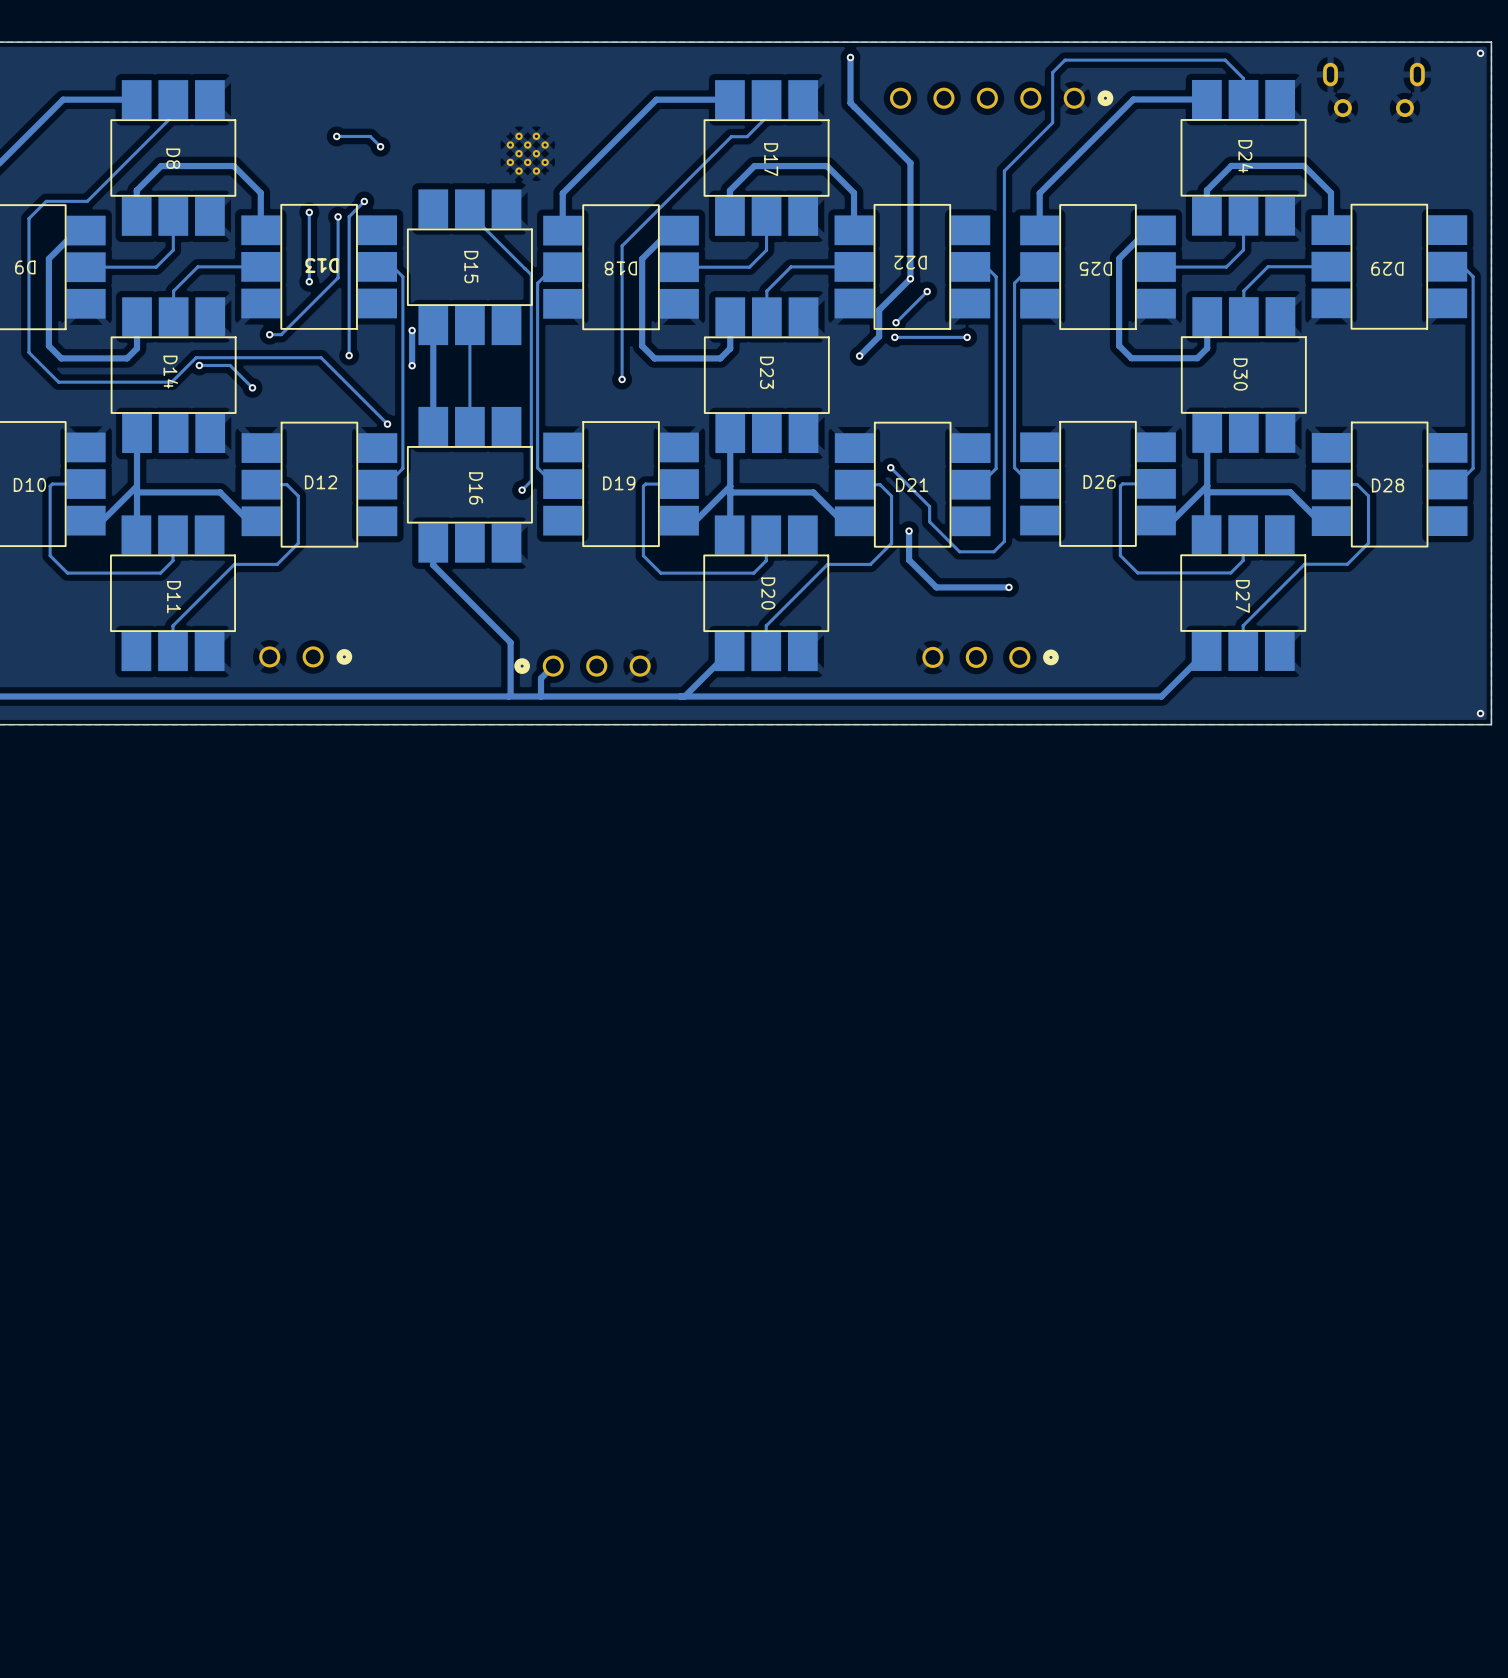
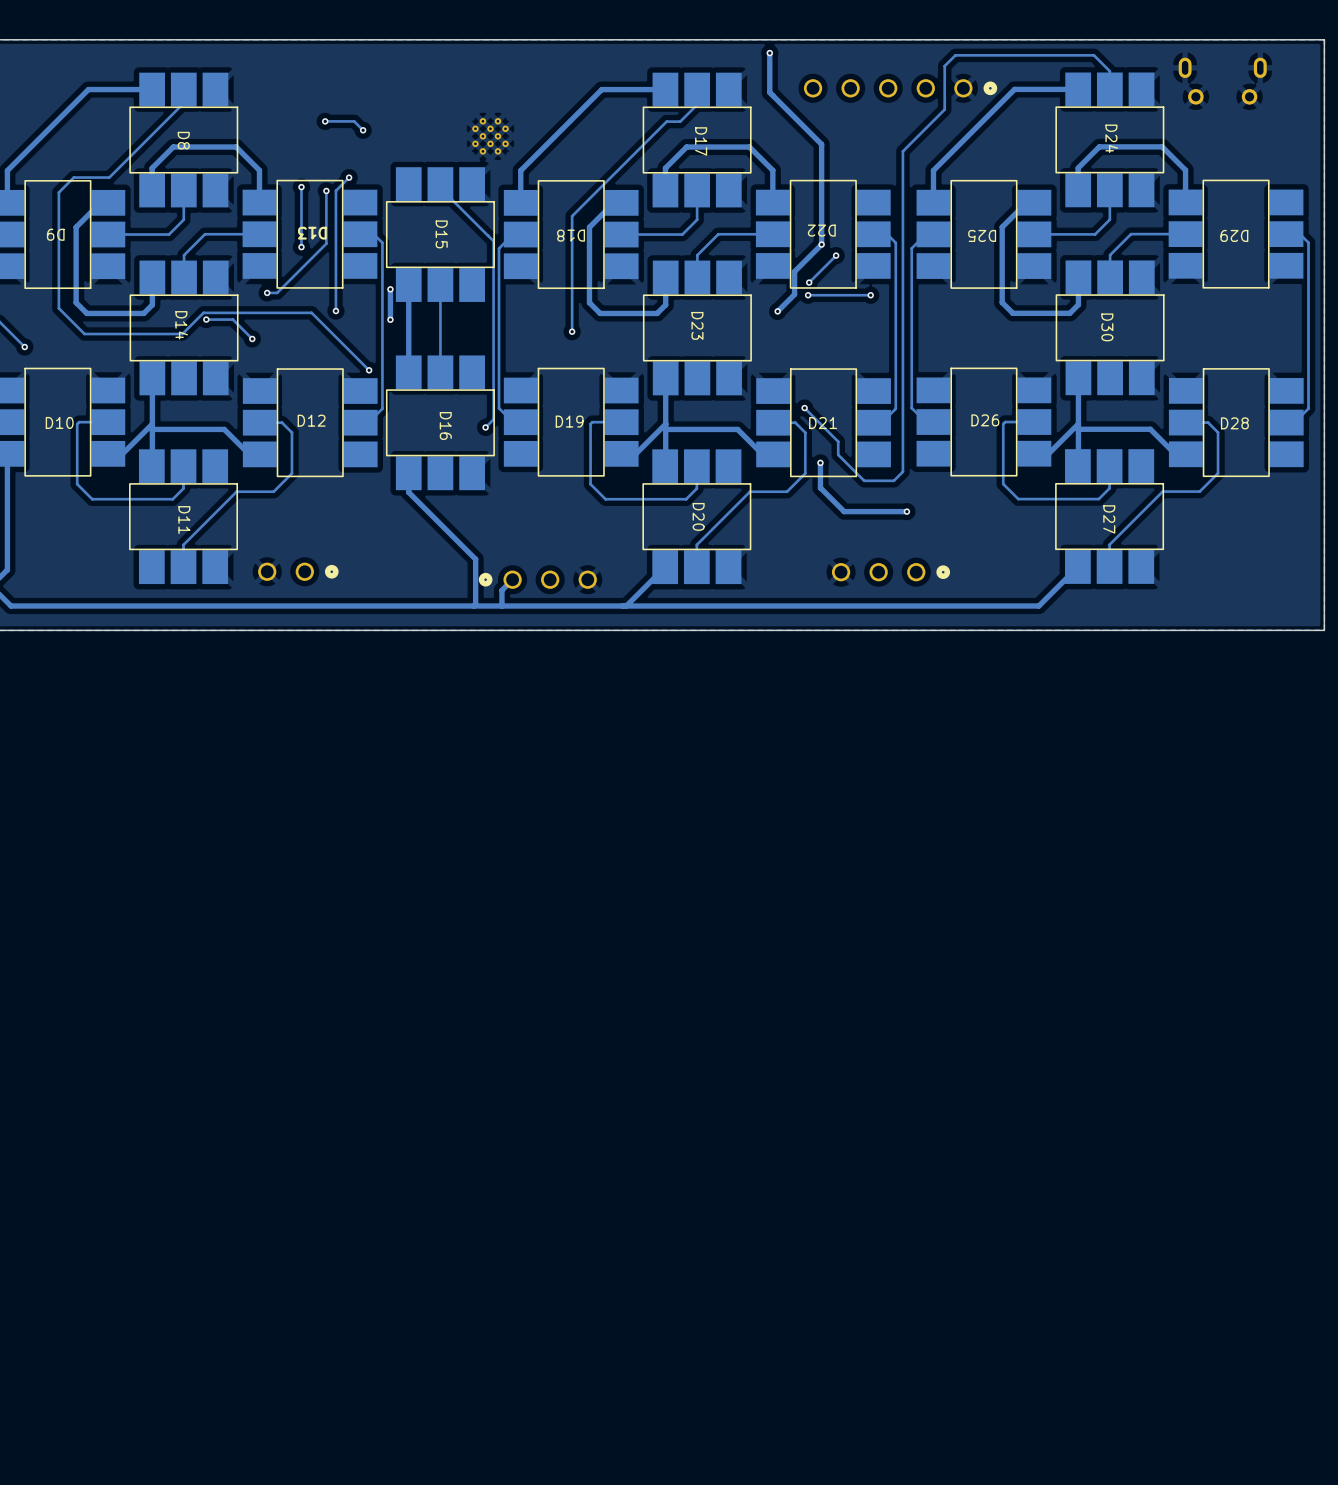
via: (1480, 53) -> none
via: (1480, 713) -> none

